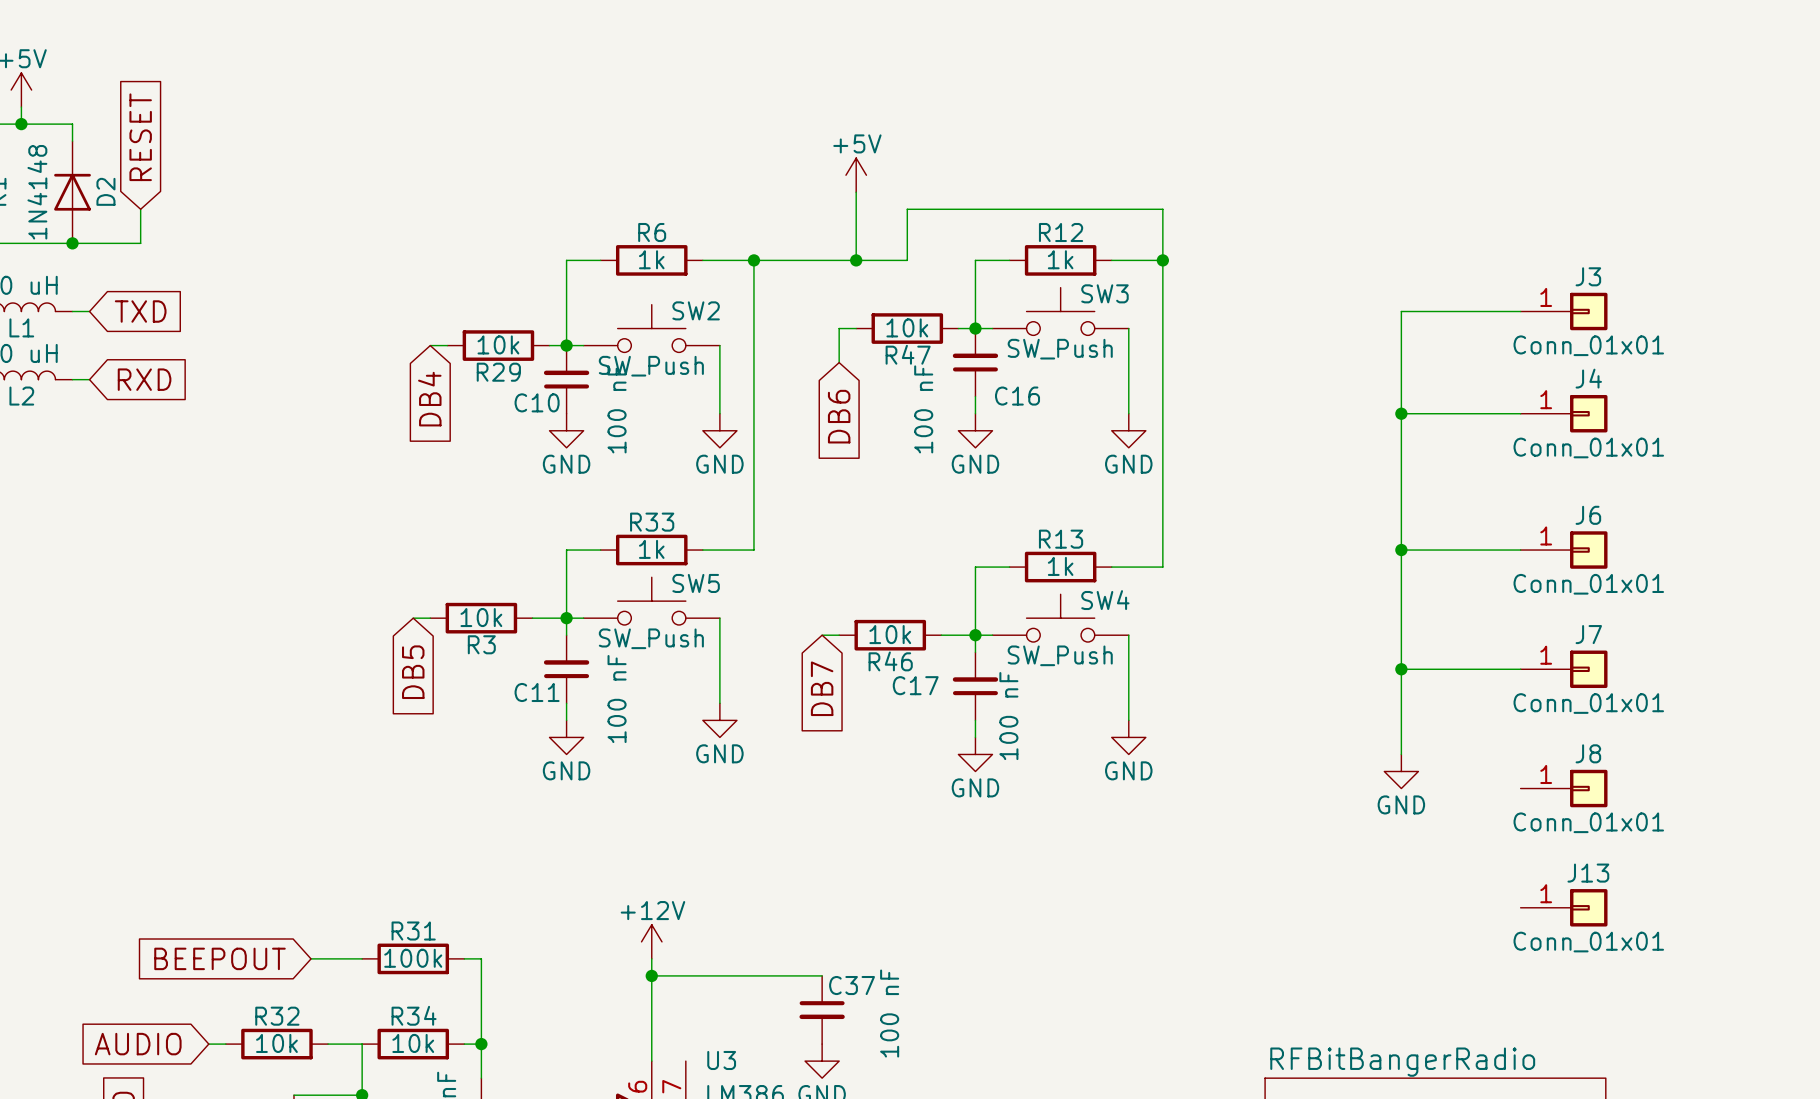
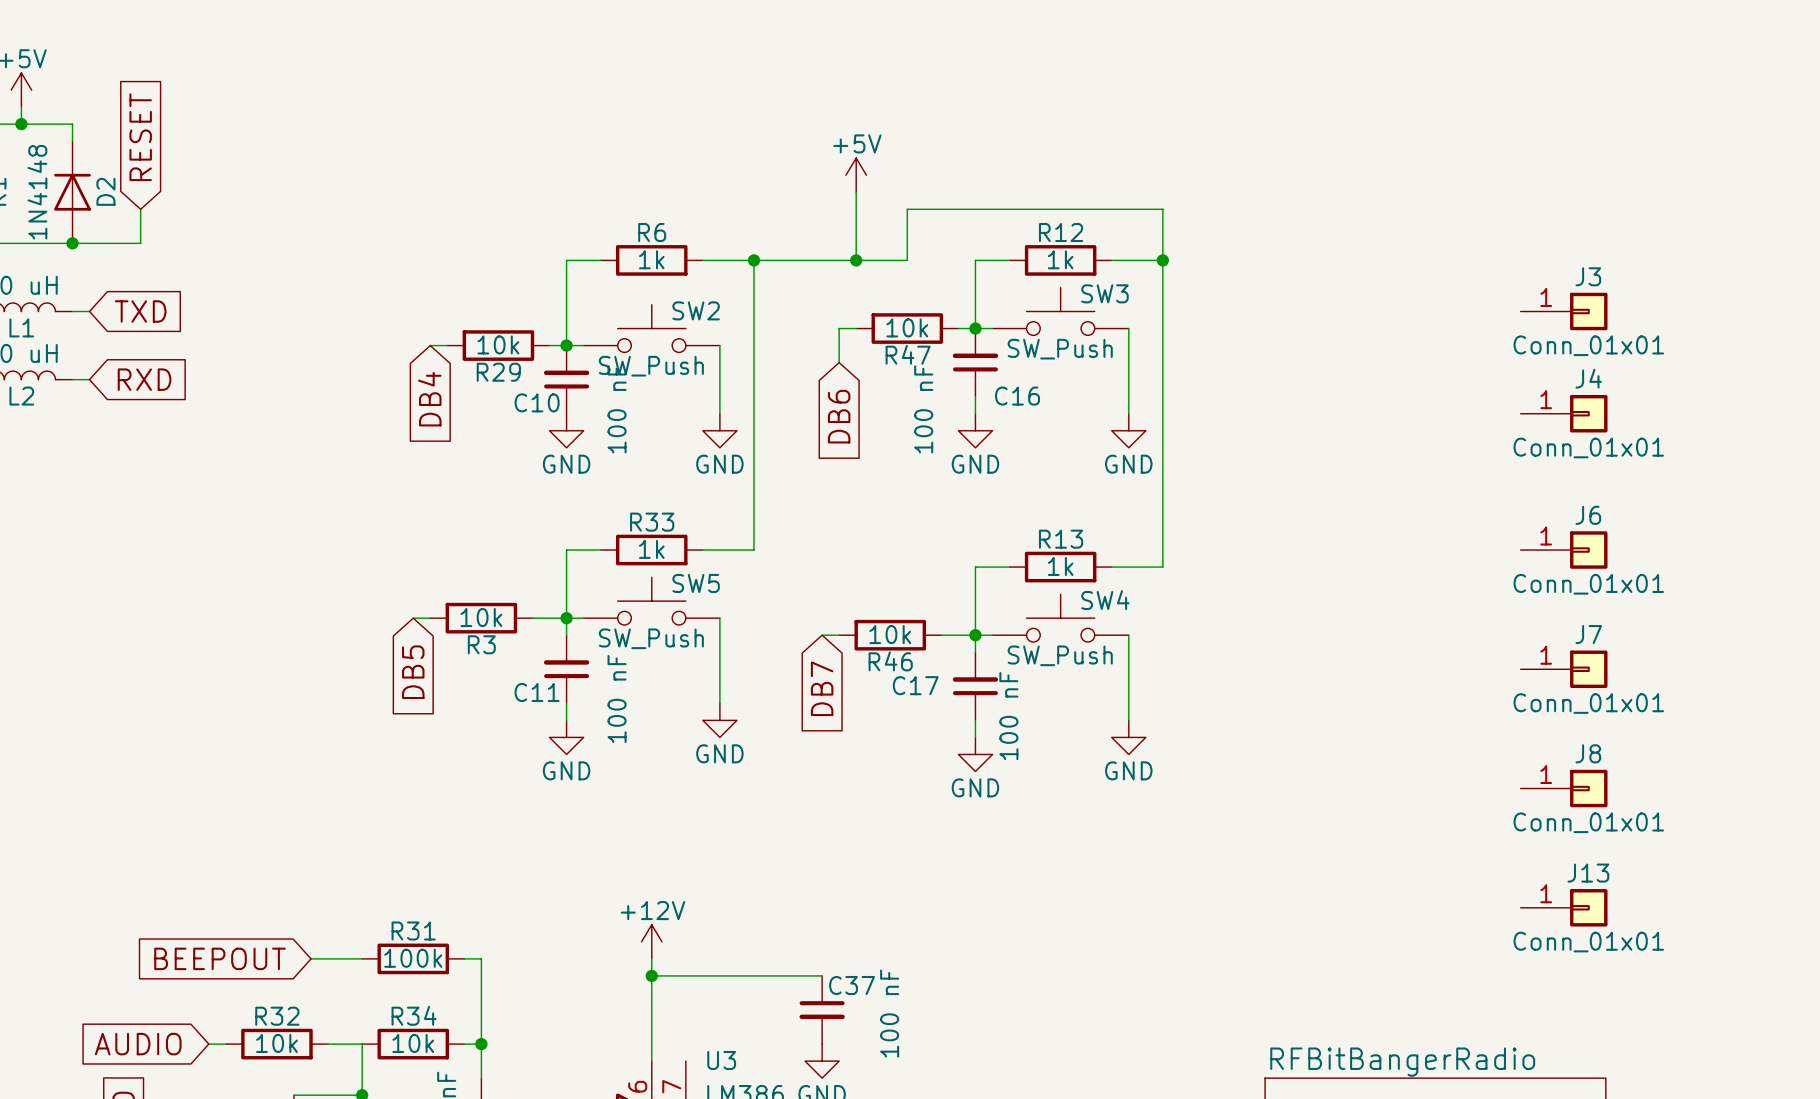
wire: (1520, 311) (1401, 311) (1401, 754) -> none
wire: (1401, 413) (1520, 413) -> none
junction: (1401, 413) -> none
wire: (1401, 550) (1520, 550) -> none
junction: (1401, 550) -> none
wire: (1401, 669) (1520, 669) -> none
junction: (1401, 669) -> none
power symbol: GND (1401, 771) -> none

